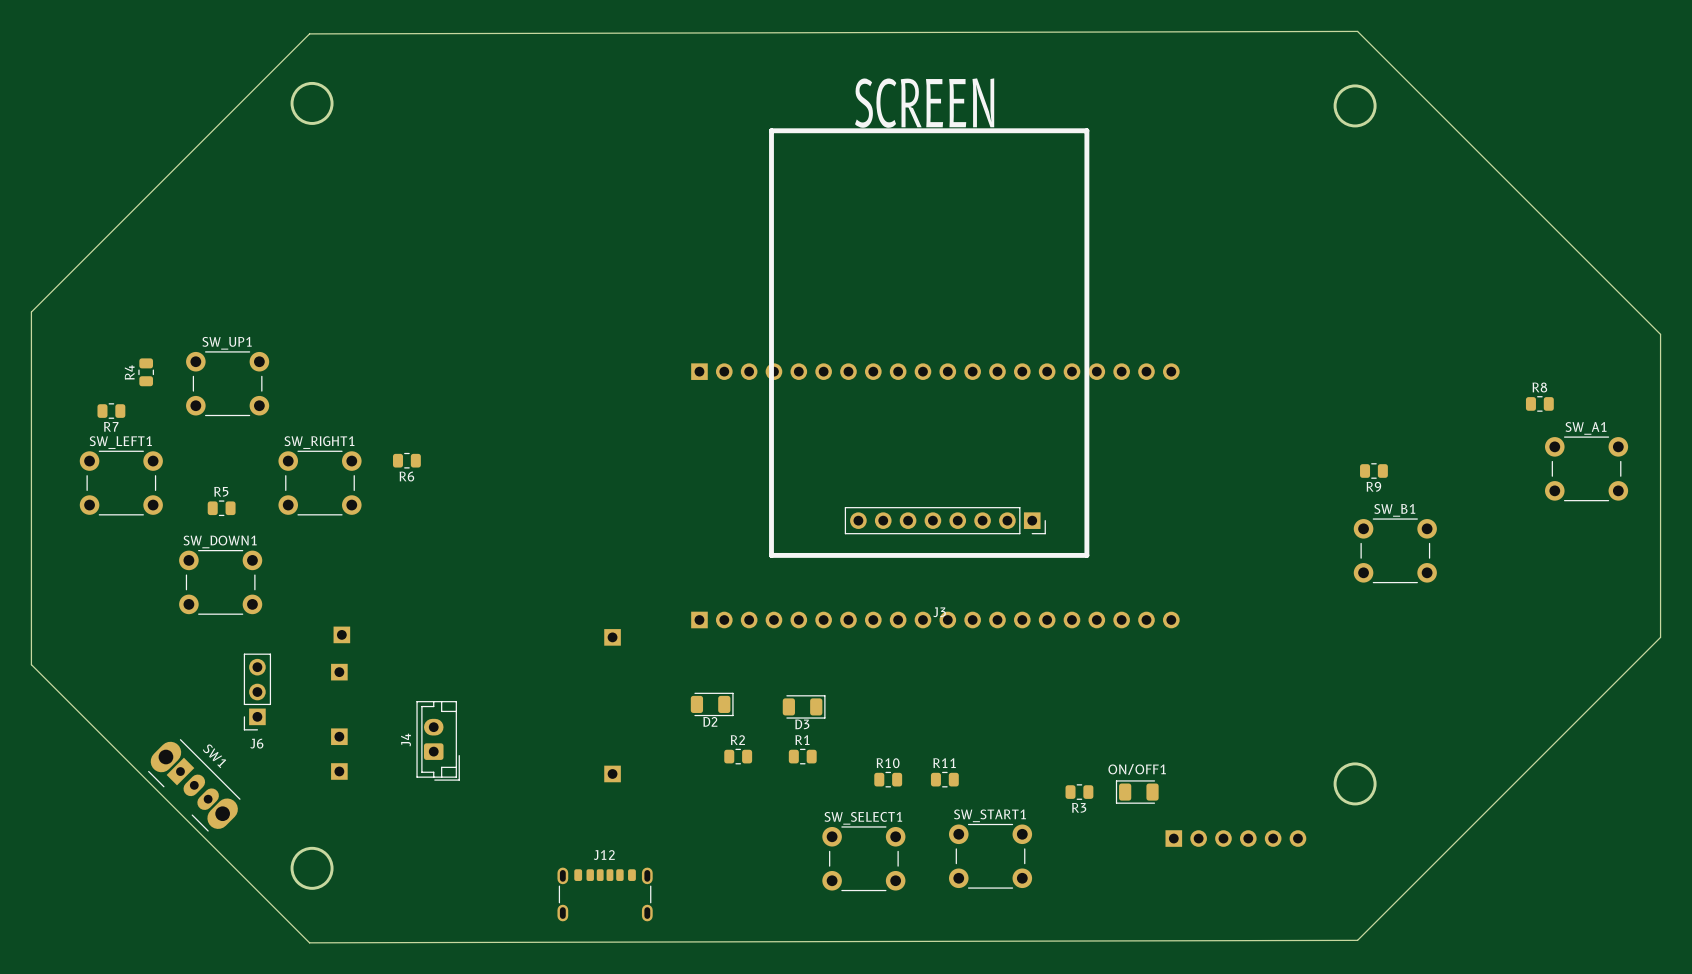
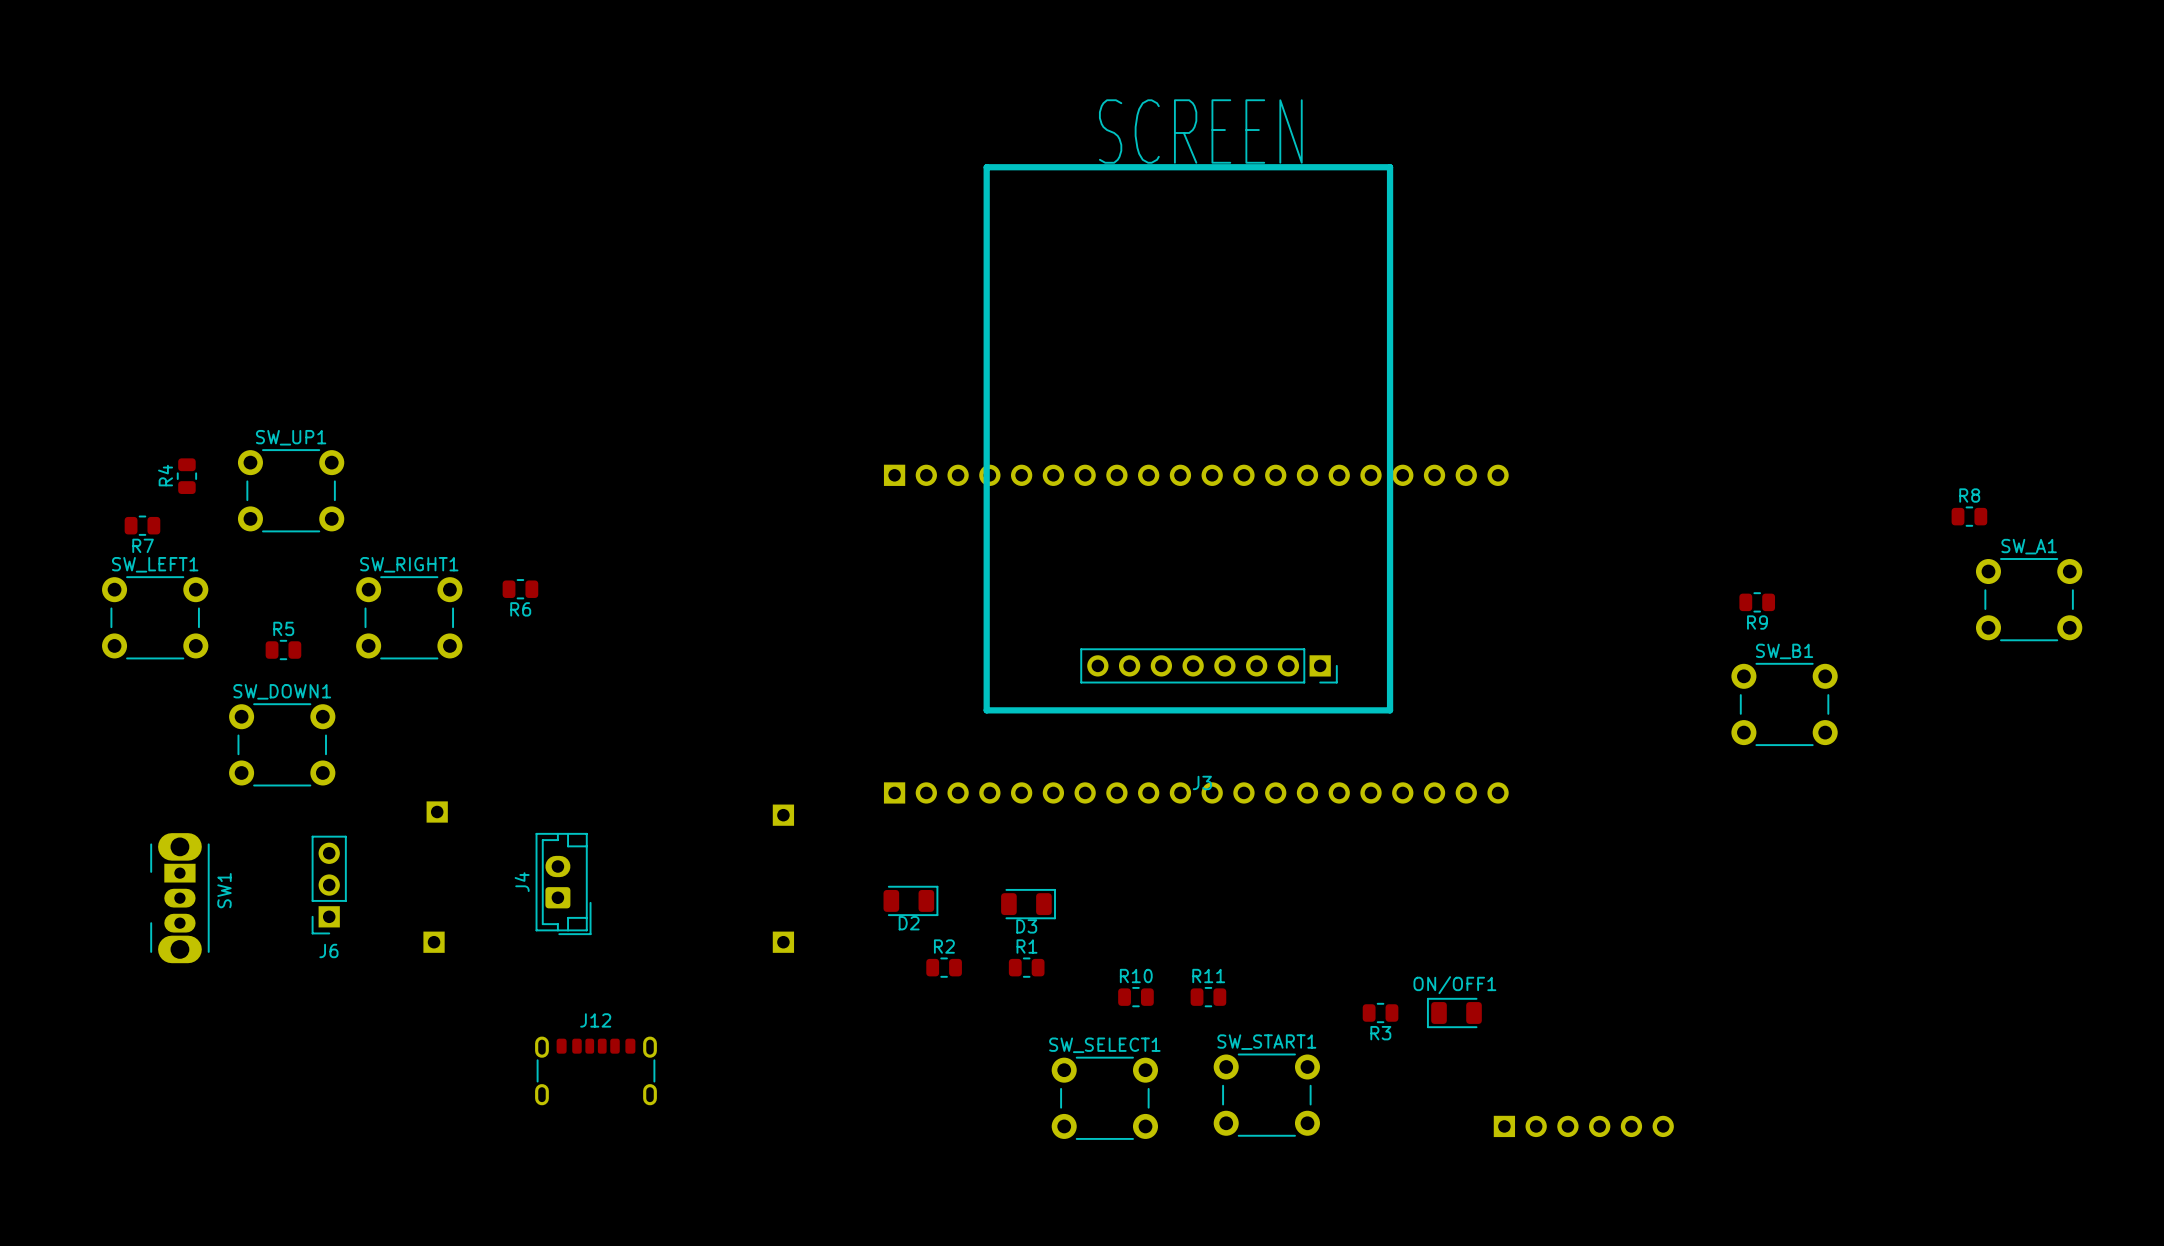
board edge: (1357, 31) (1660, 334) (1660, 637) (1357, 940) (309, 942) (31, 664) (31, 312) (309, 33) (1357, 31) -> none
round board edge: [290, 81, 334, 125] -> none
round board edge: [1333, 84, 1377, 128] -> none
part: (339, 672) -> none
J4 position: (438, 740) -> (563, 884)
round board edge: [1333, 762, 1377, 806] -> none
part: (339, 771) -> none
part position: (612, 773) -> (783, 942)
SW1 rotation: 0° (194, 785) -> 45° clockwise (179, 898)
SW1 position: (194, 785) -> (179, 898)
part position: (1235, 838) -> (1583, 1126)
round board edge: [290, 846, 334, 890] -> none
J12 position: (605, 894) -> (595, 1070)

